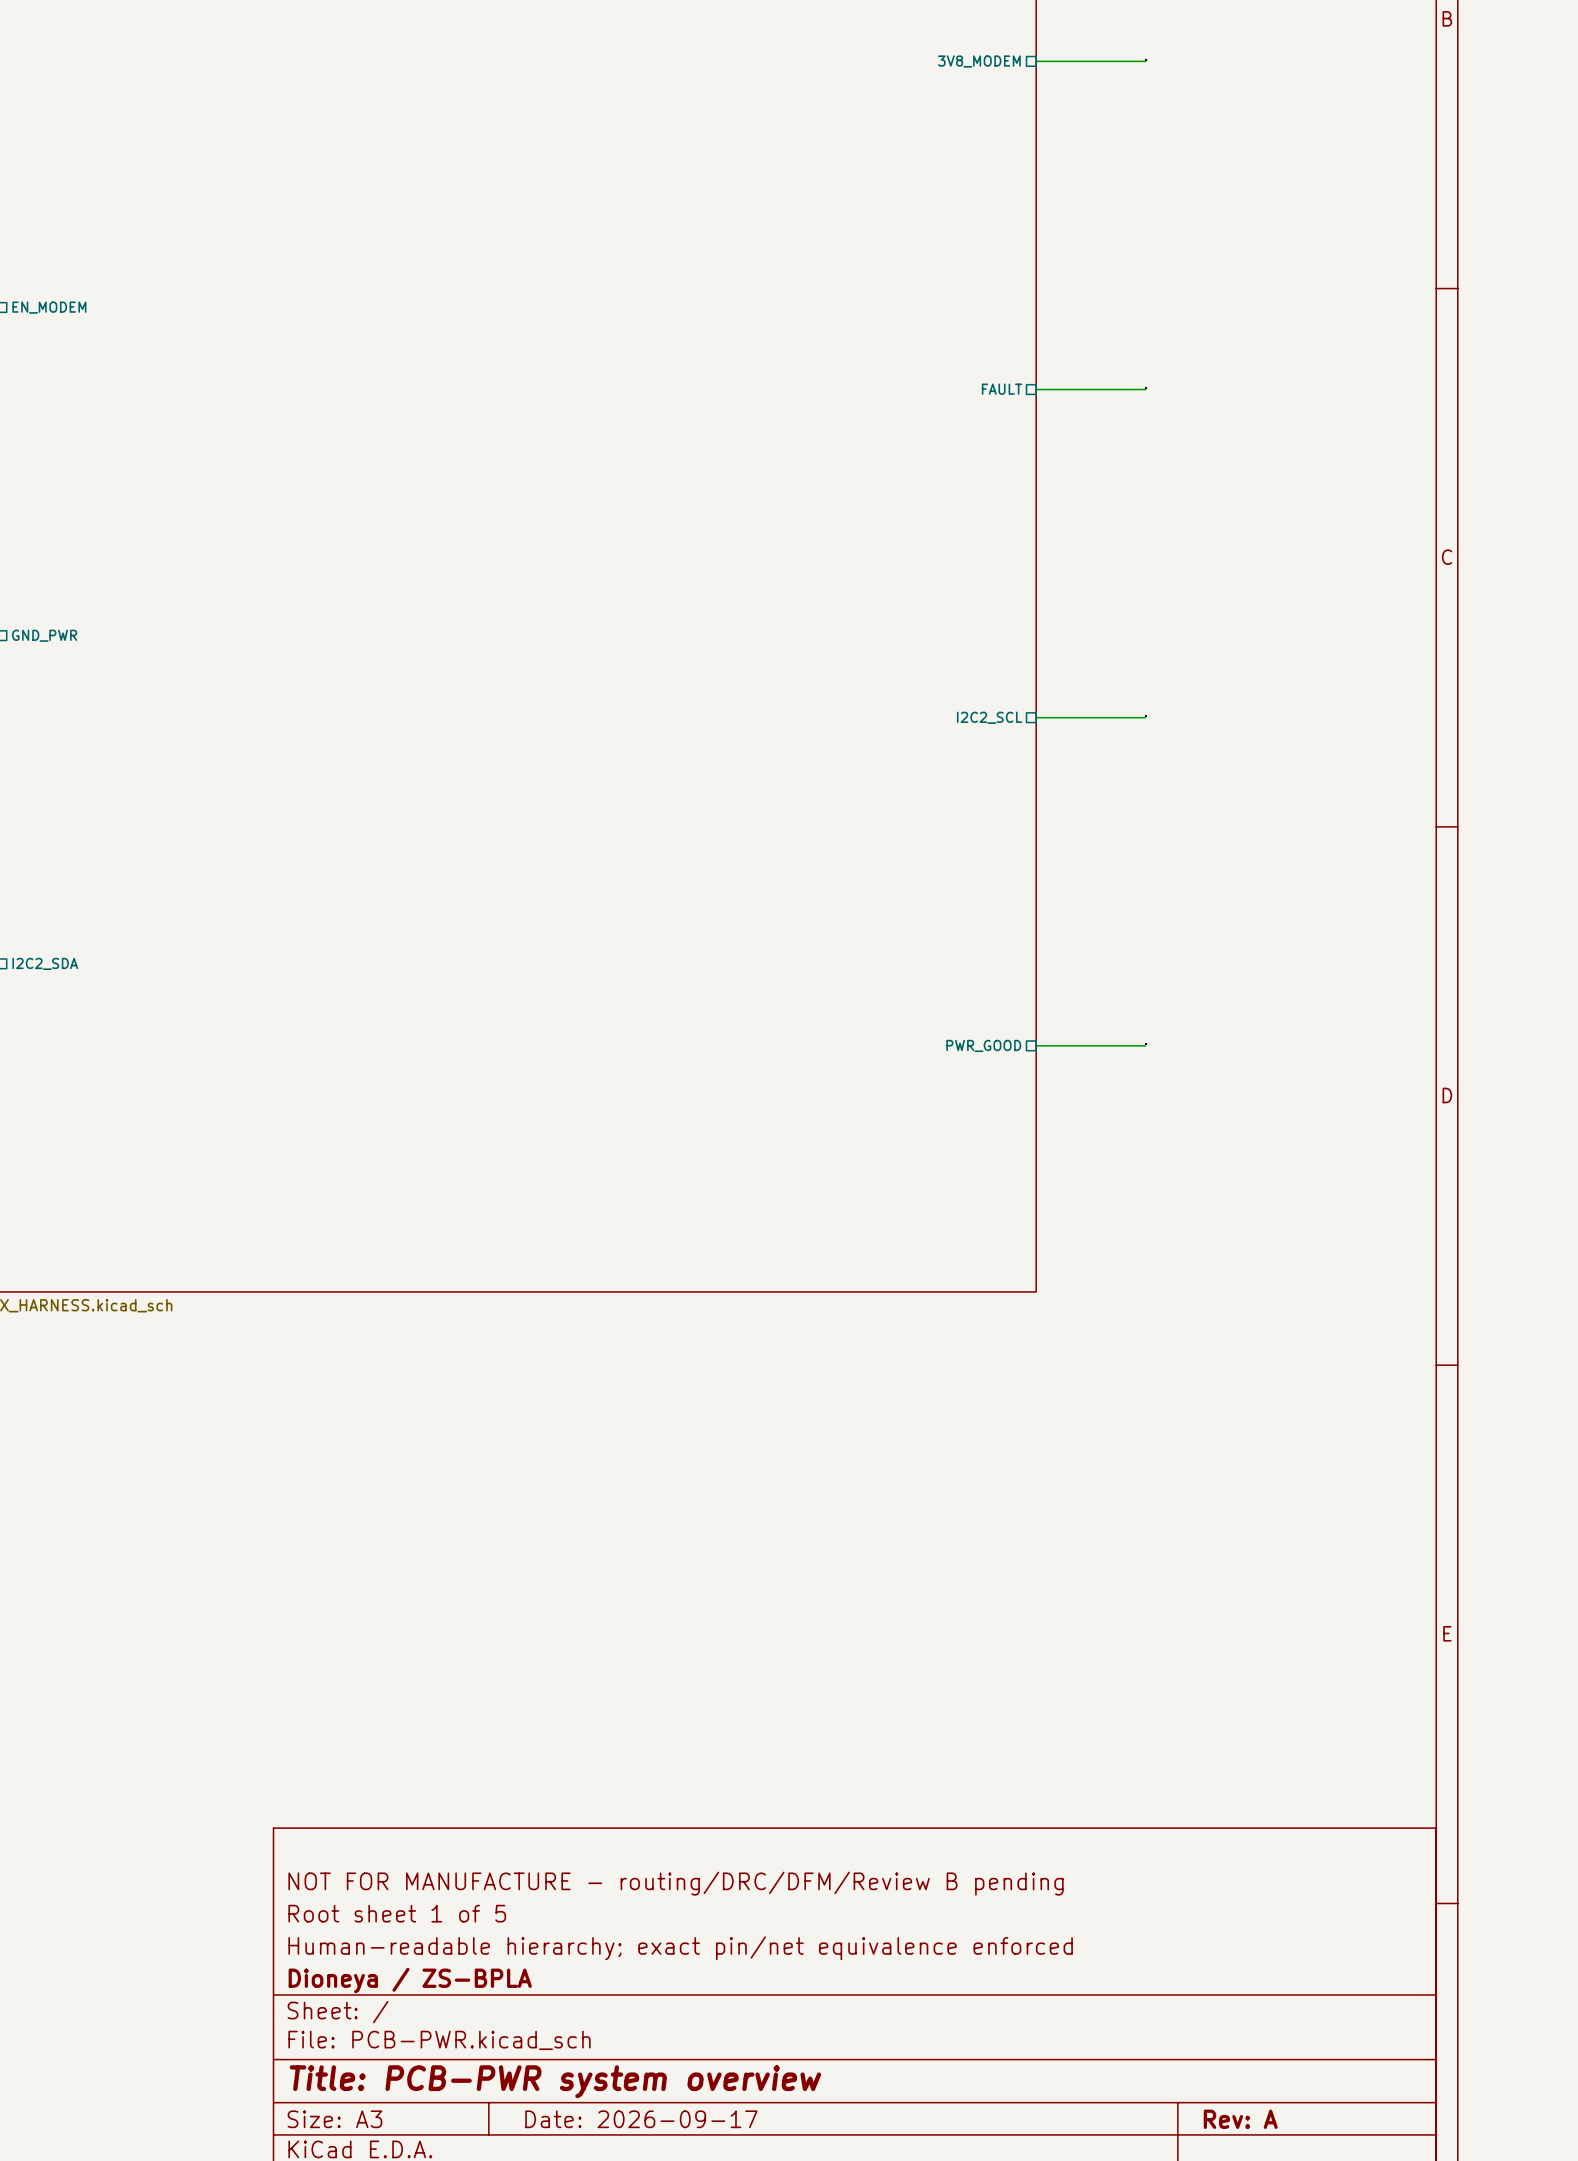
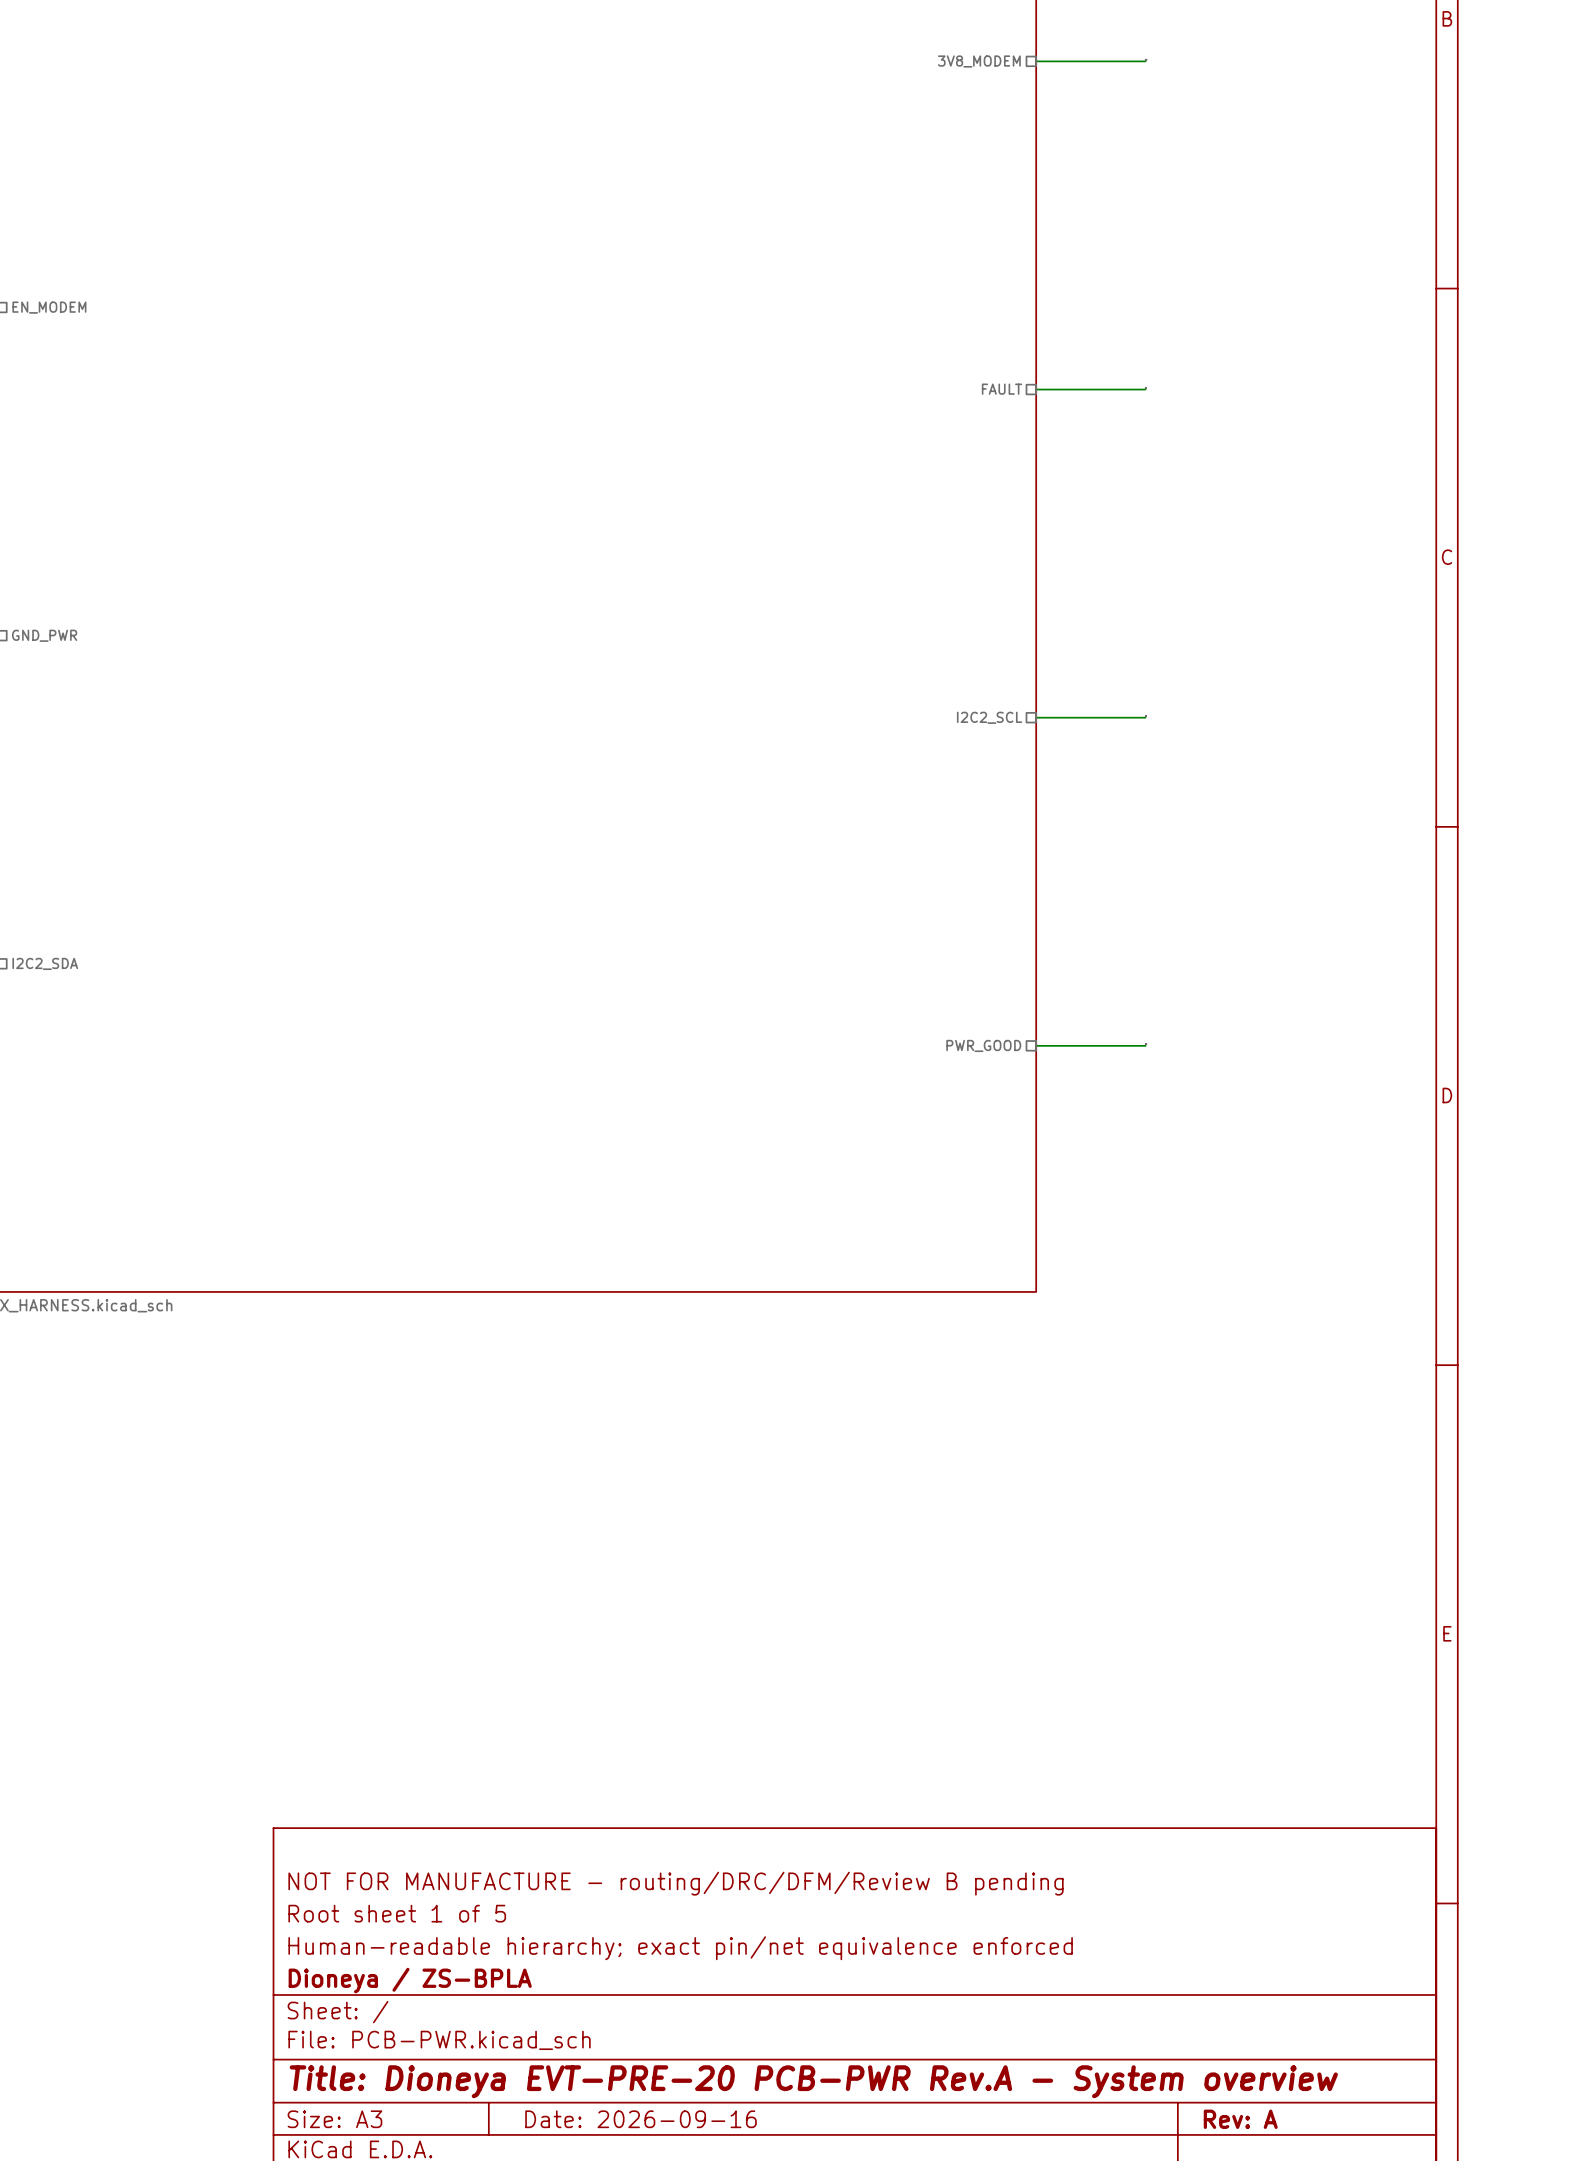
title block: Title: PCB-PWR system overview (555, 2081) -> Title: Dioneya EVT-PRE-20 PCB-PWR Rev.A - System overview (813, 2081)
title block: Date: 2026-09-17 (641, 2119) -> Date: 2026-09-16 (641, 2119)

